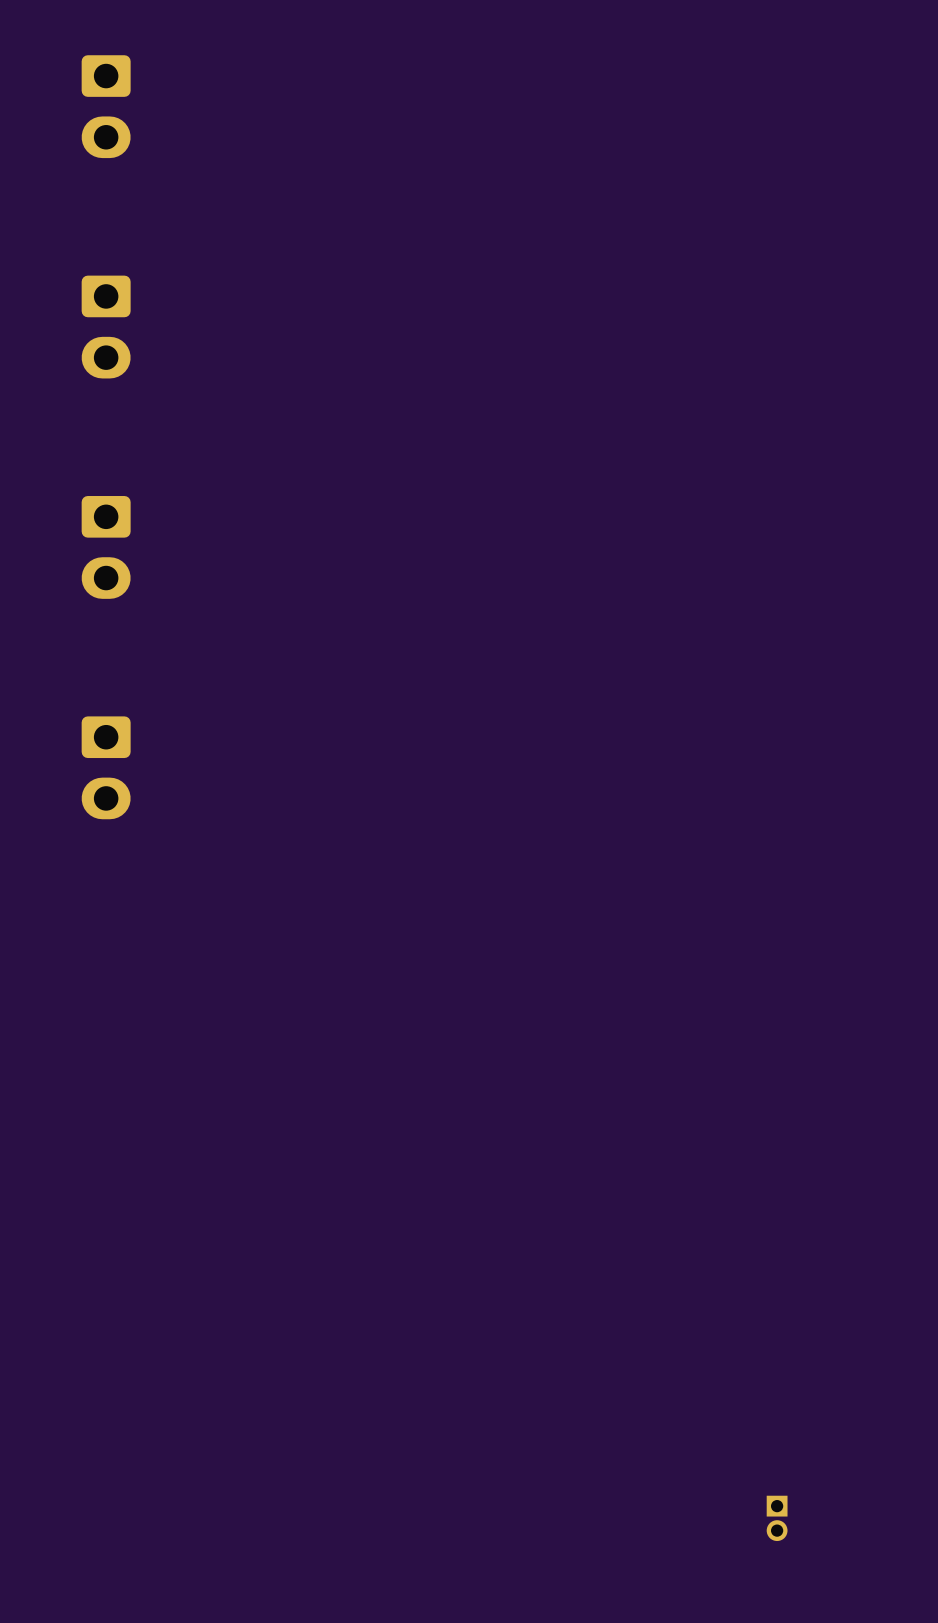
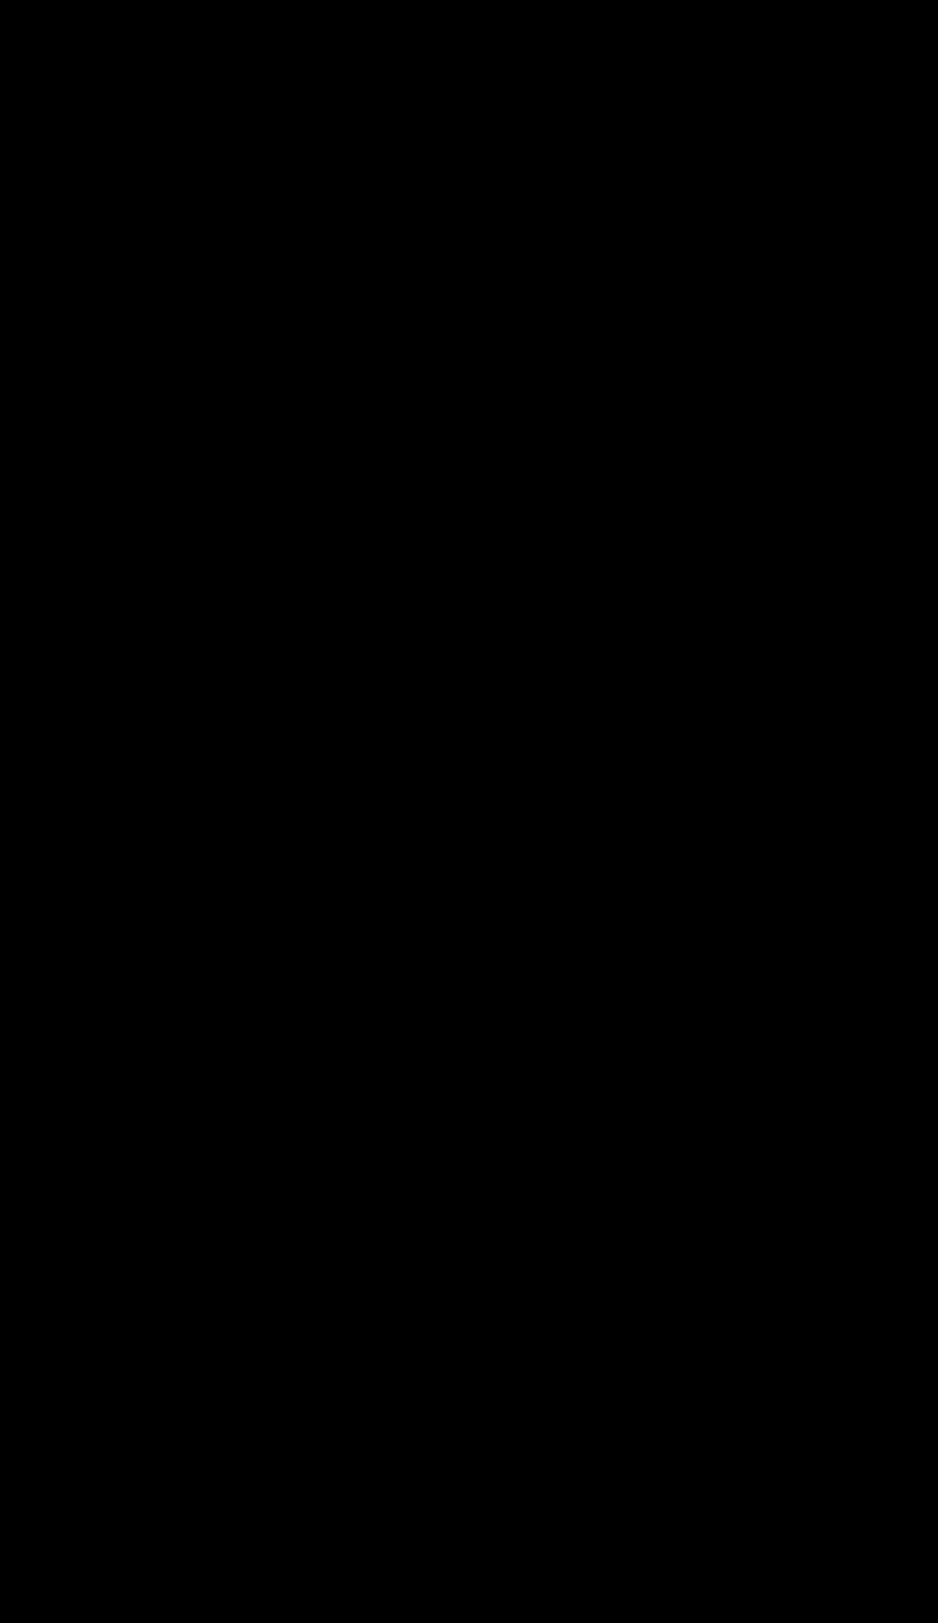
part: (106, 106) -> none
part: (106, 327) -> none
part: (106, 547) -> none
part: (106, 767) -> none
part: (777, 1518) -> none

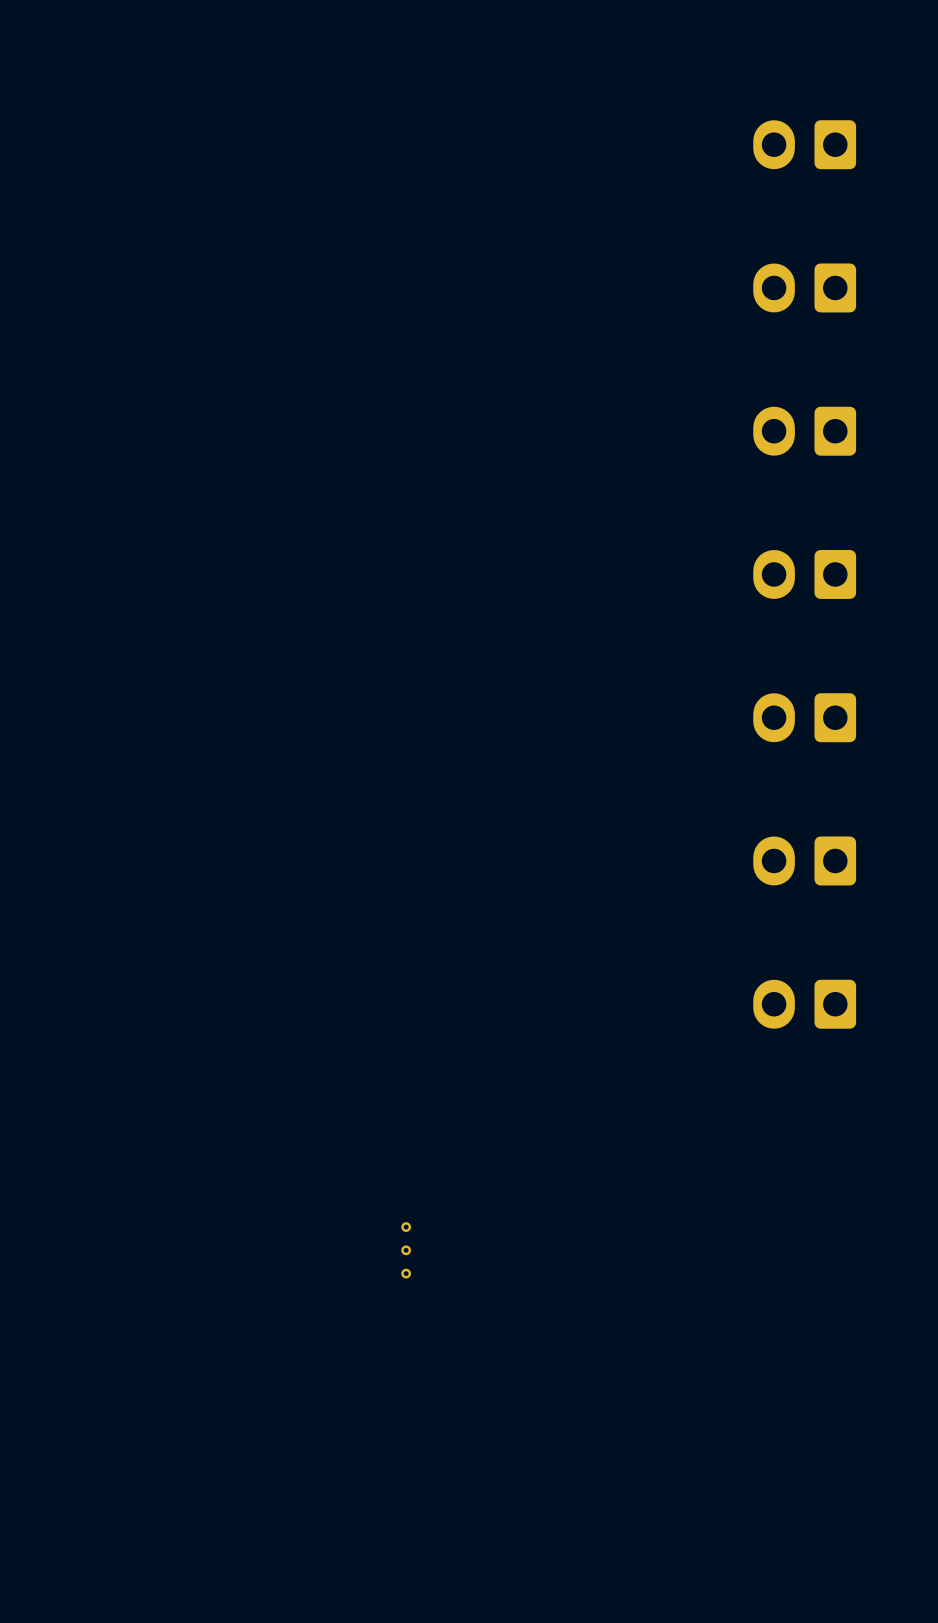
part: none -> (804, 144)
part: none -> (804, 287)
part: none -> (804, 431)
part: none -> (804, 574)
part: none -> (804, 717)
part: none -> (804, 860)
part: none -> (804, 1004)
part: none -> (406, 1250)

